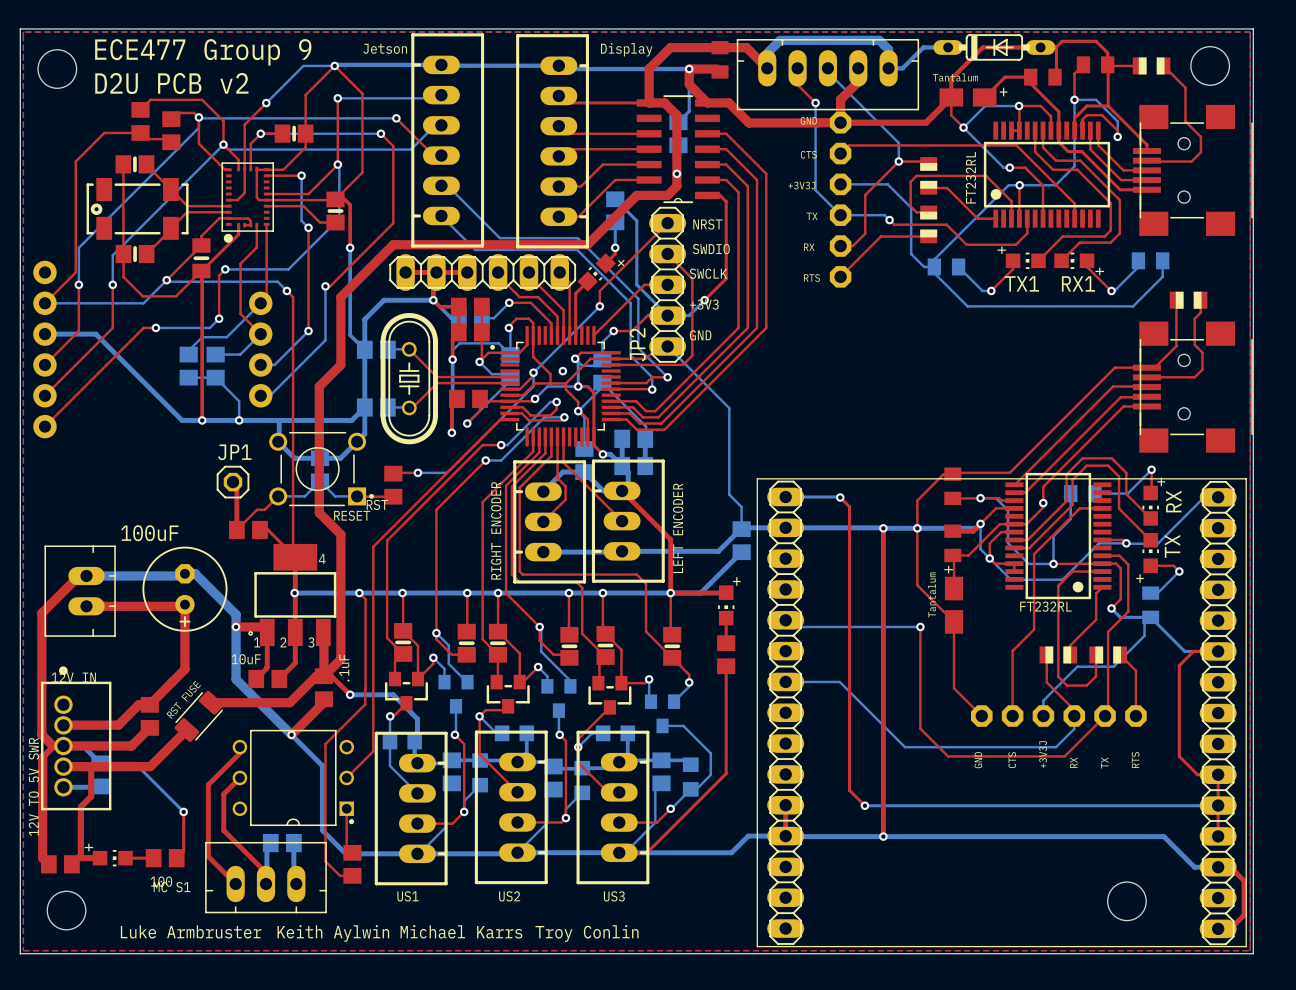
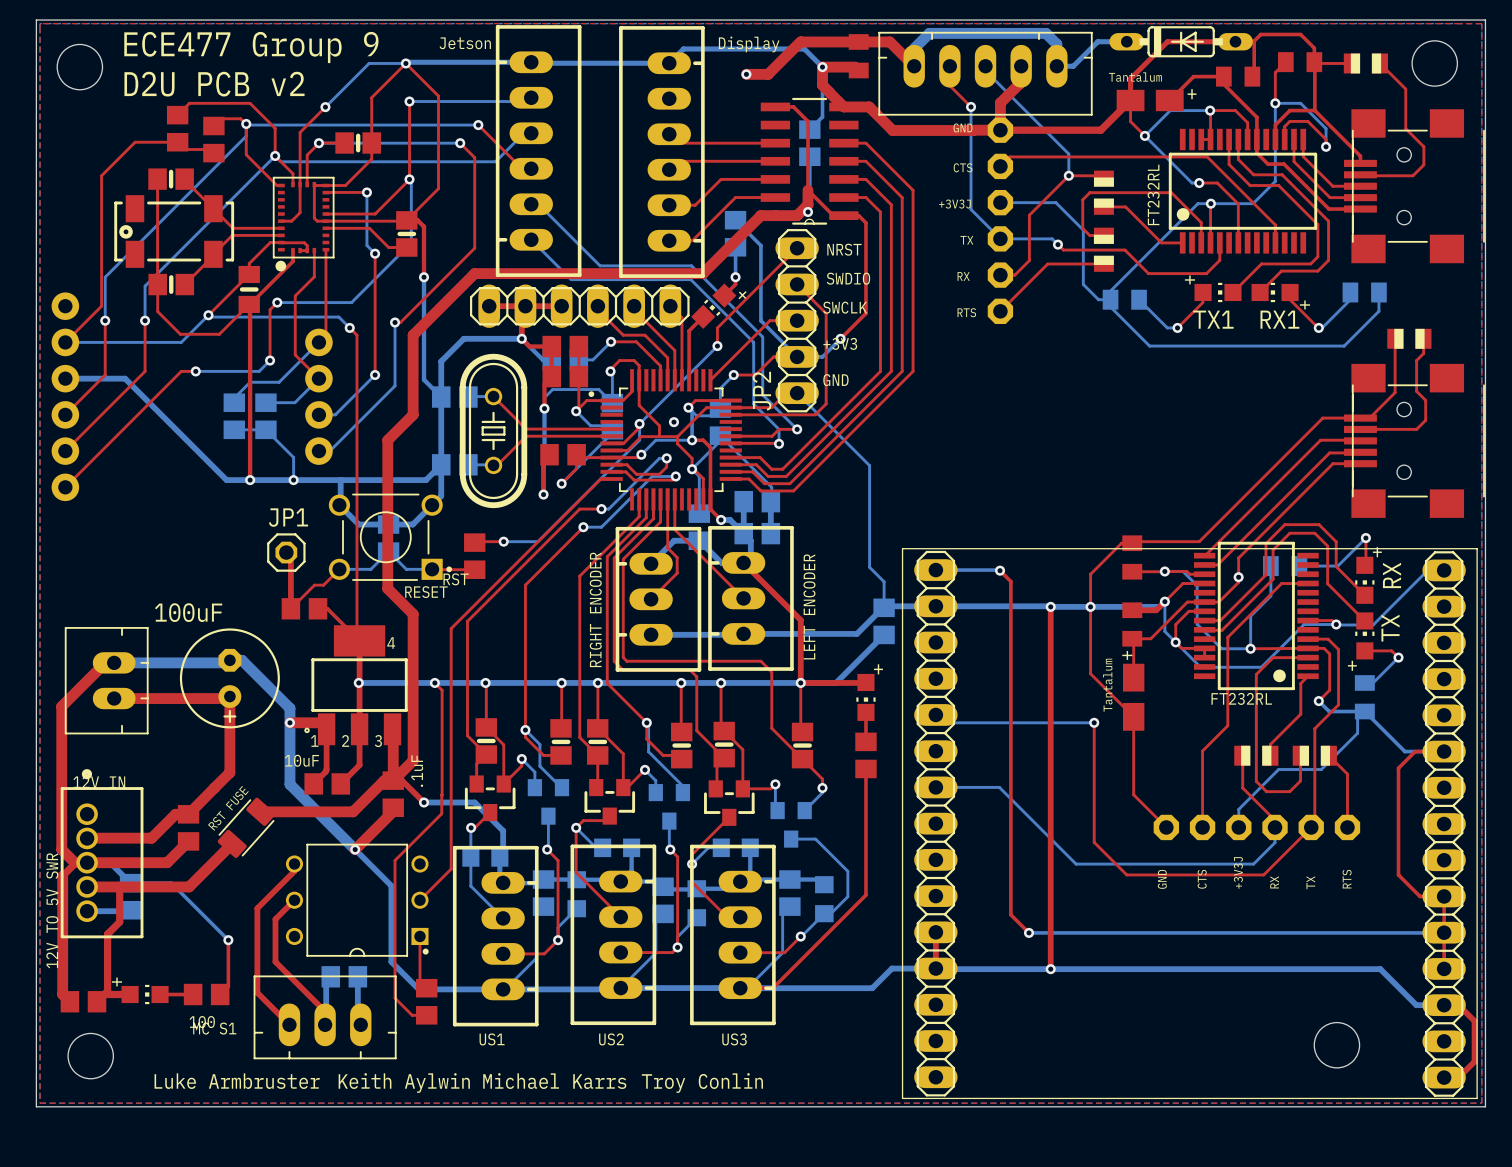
bottom track: (558, 65) (562, 69) (689, 69) -> (669, 63) (683, 48) (804, 48) (822, 67)
top track: (649, 69) (649, 102) (565, 102) -> (775, 67) (768, 74) (746, 74)
via: none -> (746, 74)
top track width: thick (649, 102) (664, 102) (676, 115) (676, 173) -> thin (775, 106) (793, 106) (808, 121) (808, 190)
top track: none -> (808, 190) (833, 215) (843, 215)
via position: (676, 173) -> (808, 212)

